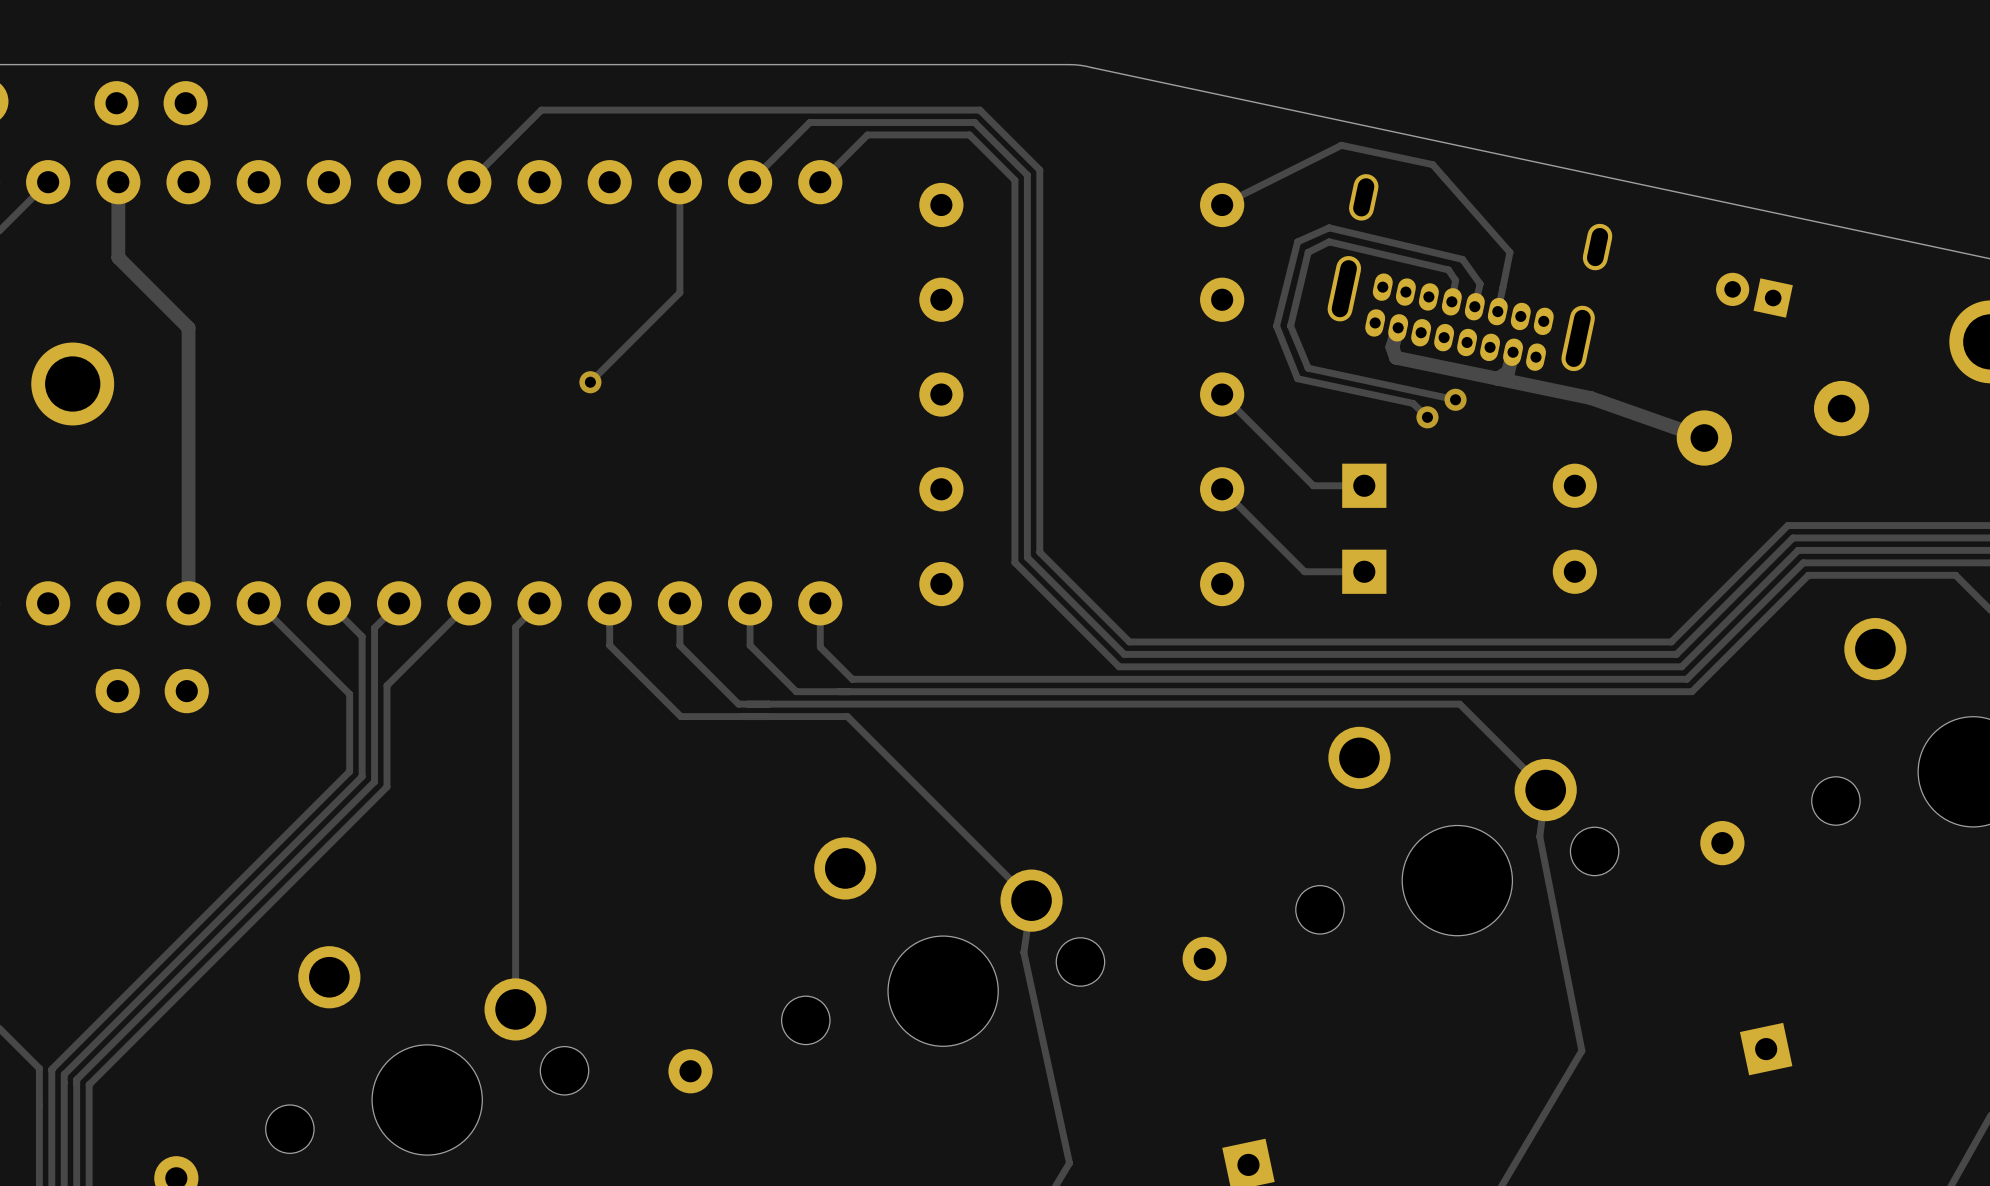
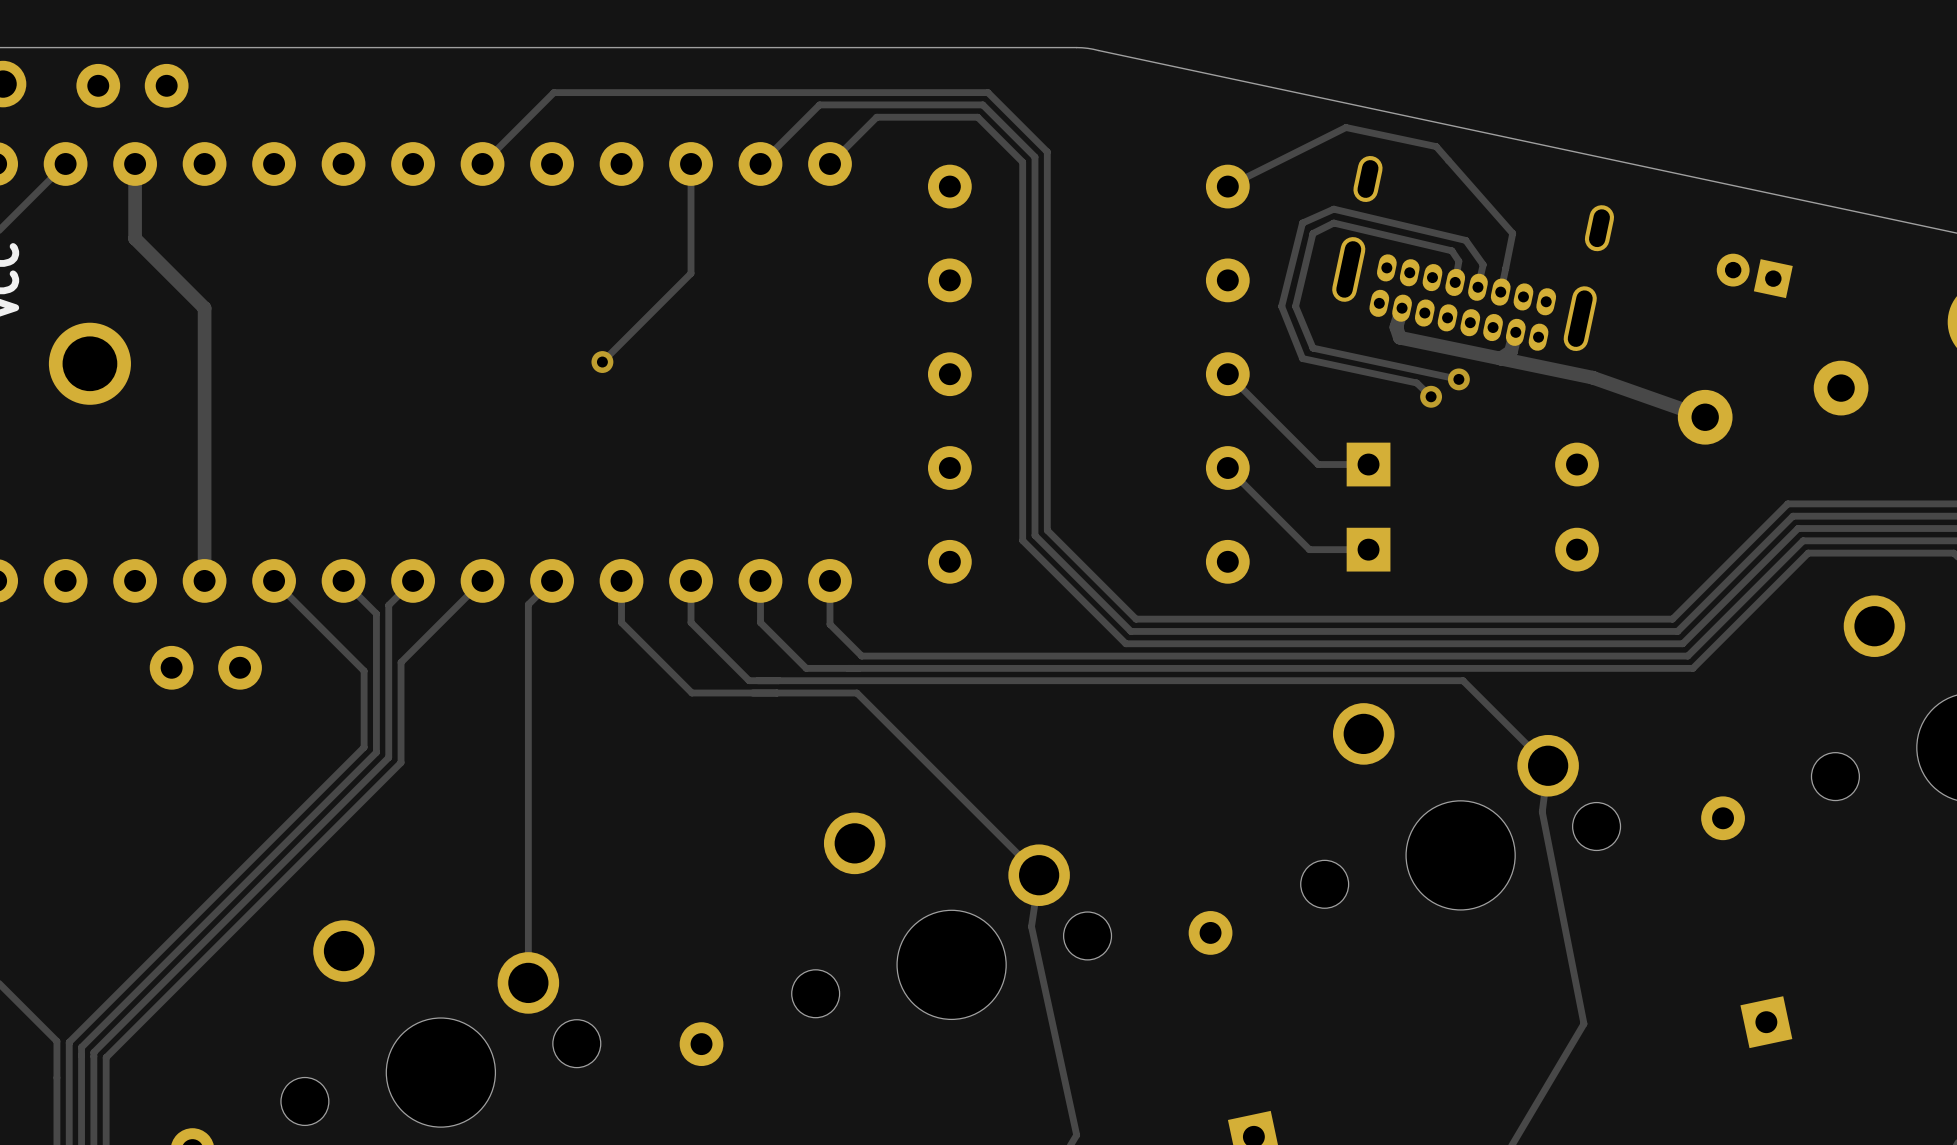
part position: (151, 103) -> (132, 85)
part position: (152, 691) -> (205, 667)

